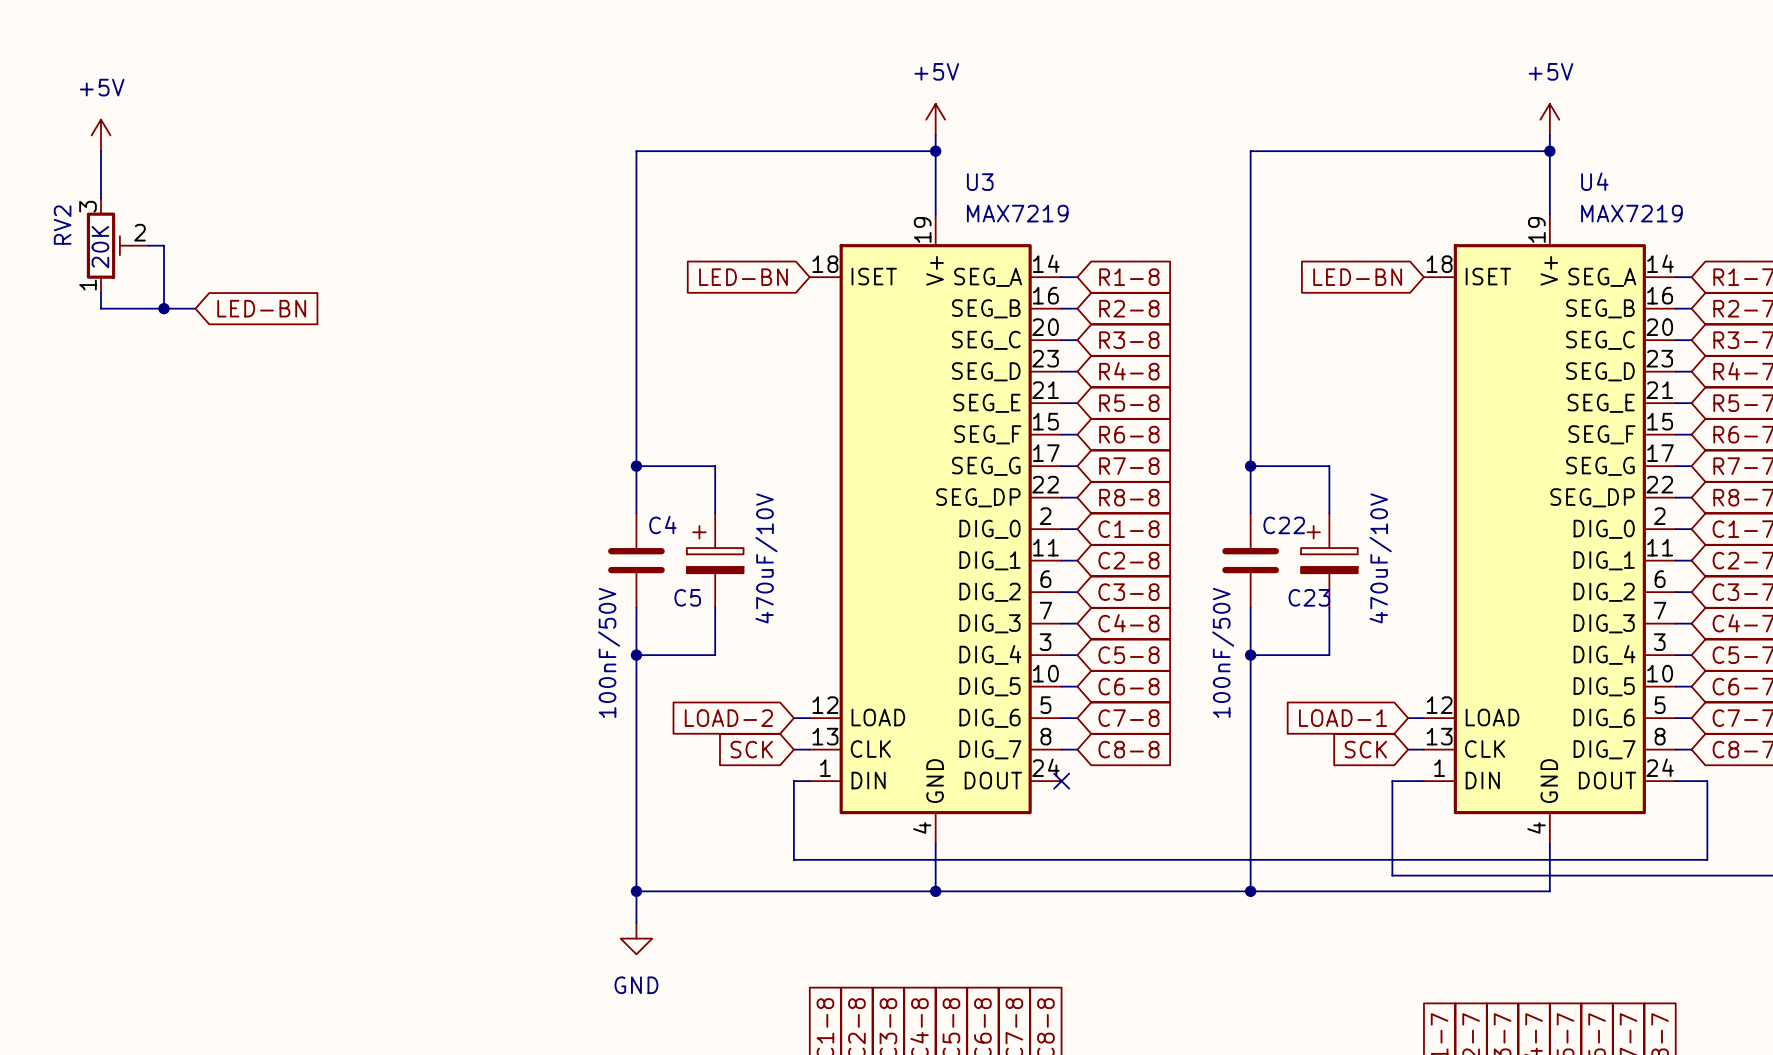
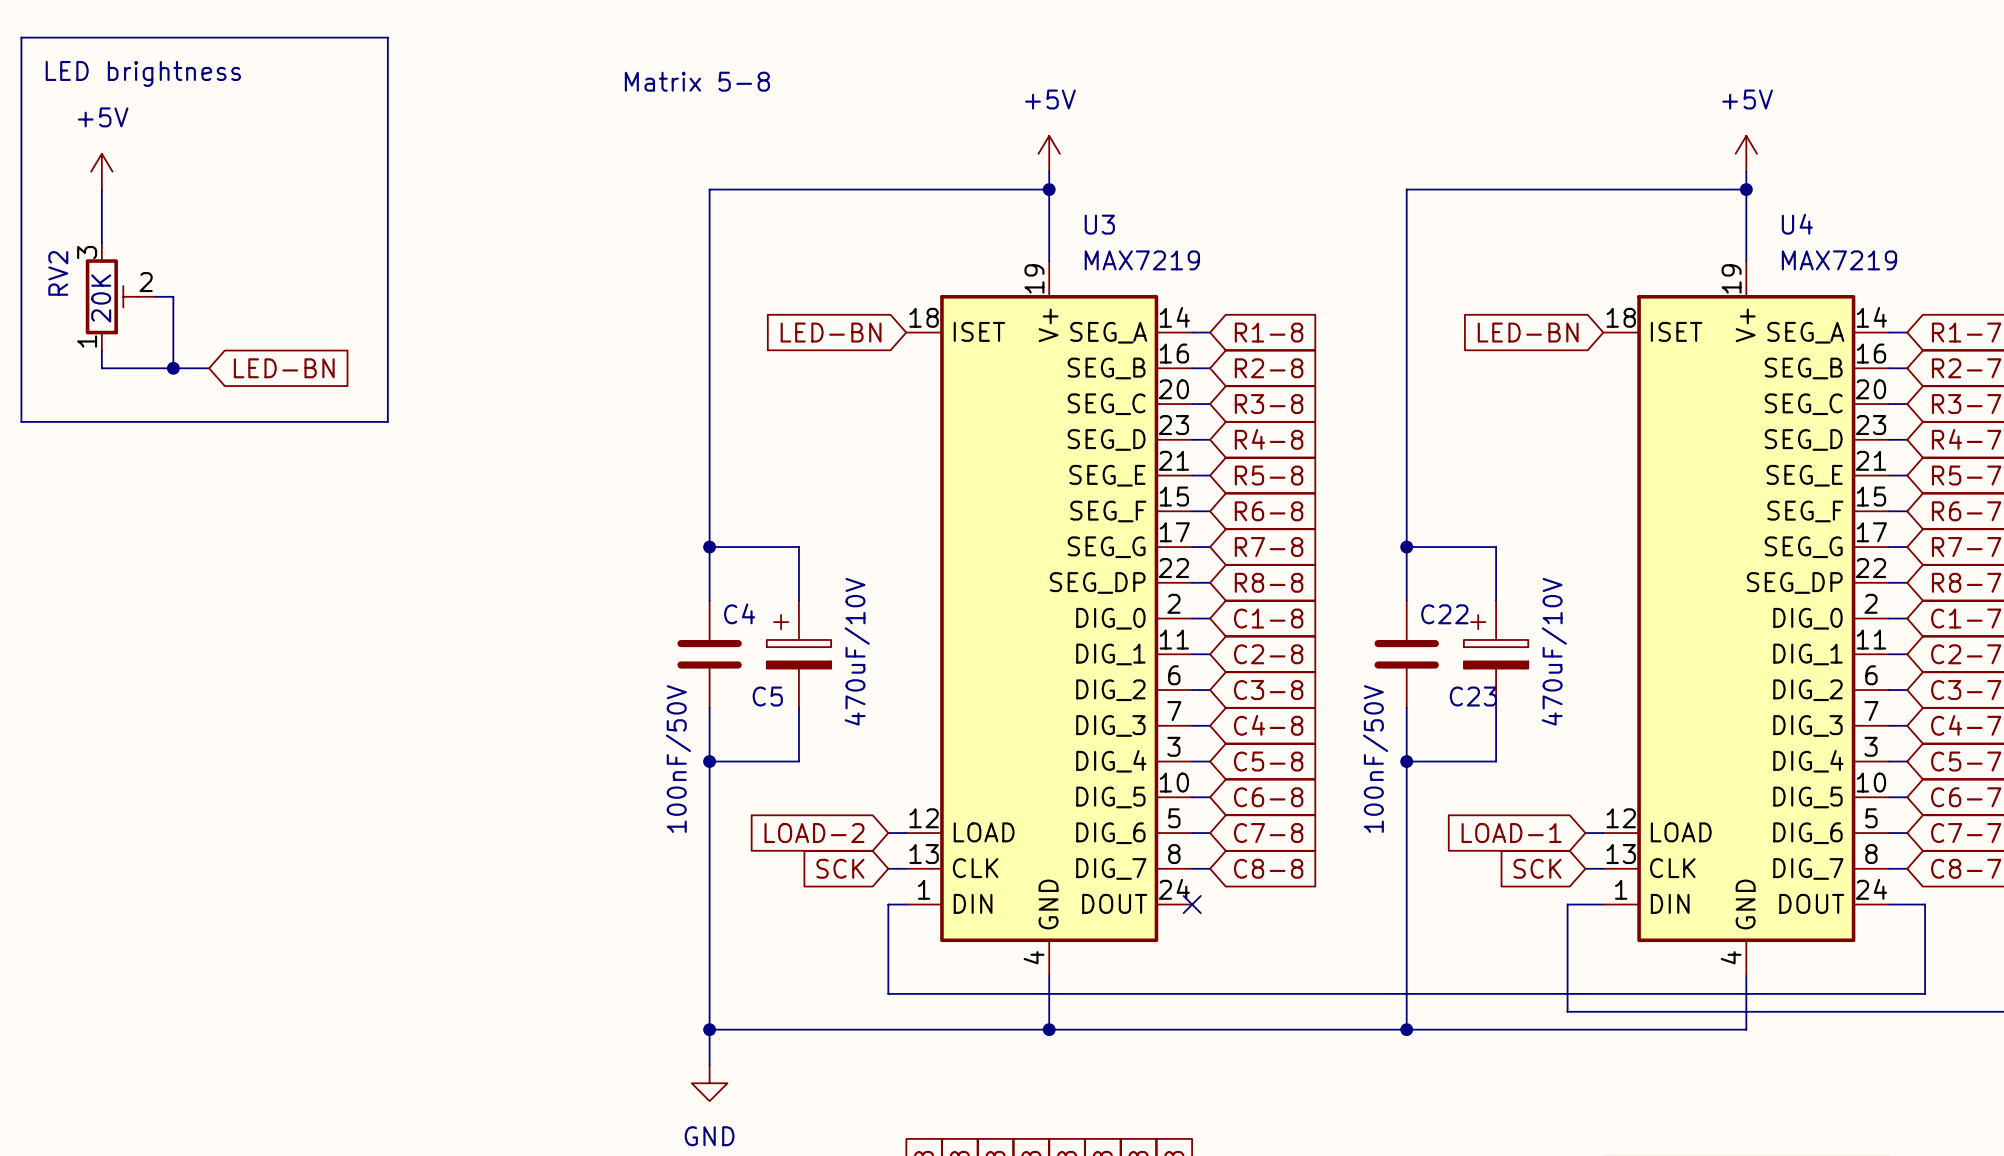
line: none -> (21, 37) (387, 37) (387, 421) (21, 421) (21, 37)
text: none -> LED brightness (143, 73)
text: none -> Matrix 5-8 (697, 81)

